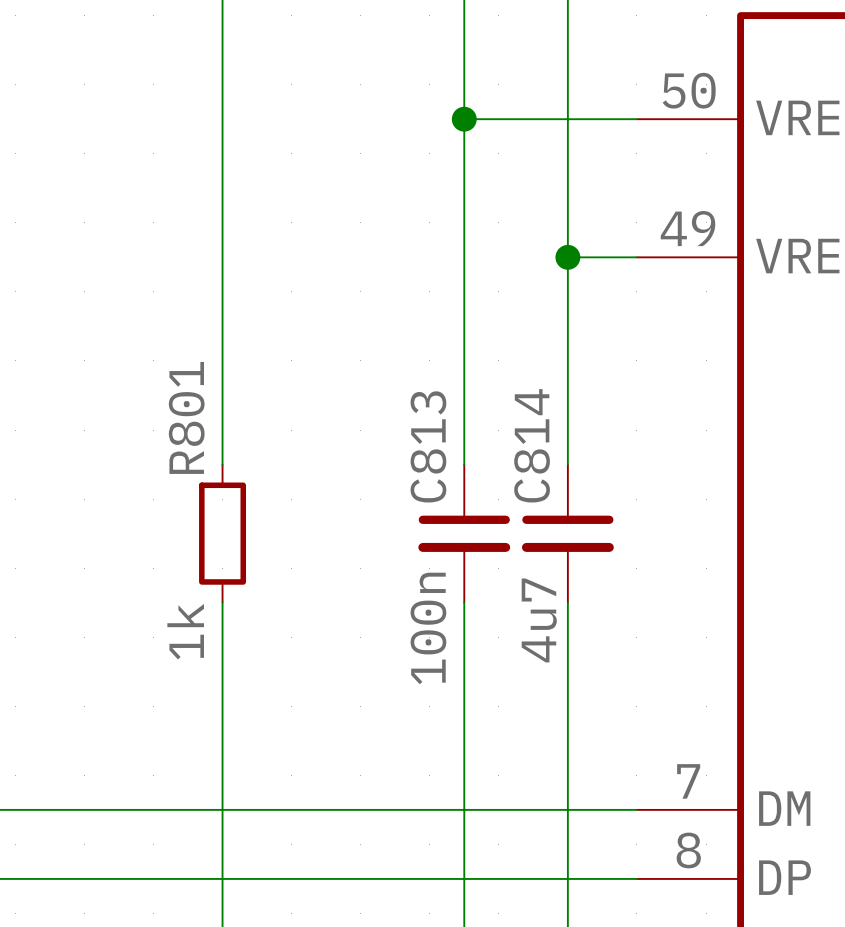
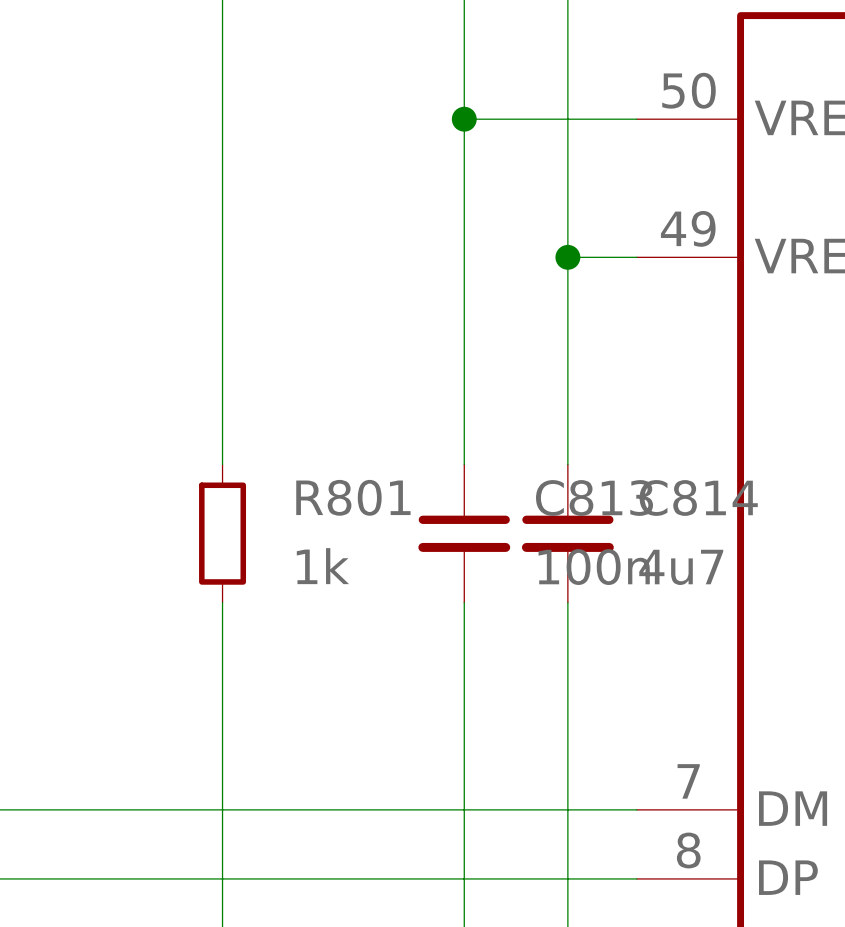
R801 name rotation: 0° (186, 417) -> 90° clockwise (353, 497)
R801 name position: R801 (186, 417) -> R801 (353, 497)
C814 name rotation: 0° (532, 445) -> 90° clockwise (698, 497)
C814 name position: C814 (532, 445) -> C814 (698, 497)
C813 name rotation: 0° (428, 446) -> 90° clockwise (594, 497)
C813 name position: C813 (428, 446) -> C813 (594, 497)
C814 value rotation: 0° (539, 620) -> 90° clockwise (681, 567)
C814 value position: 4u7 (539, 620) -> 4u7 (681, 567)
C813 value rotation: 0° (428, 628) -> 90° clockwise (594, 567)
C813 value position: 100n (428, 628) -> 100n (594, 567)
R801 value rotation: 0° (185, 631) -> 90° clockwise (322, 566)
R801 value position: 1k (185, 631) -> 1k (322, 566)

